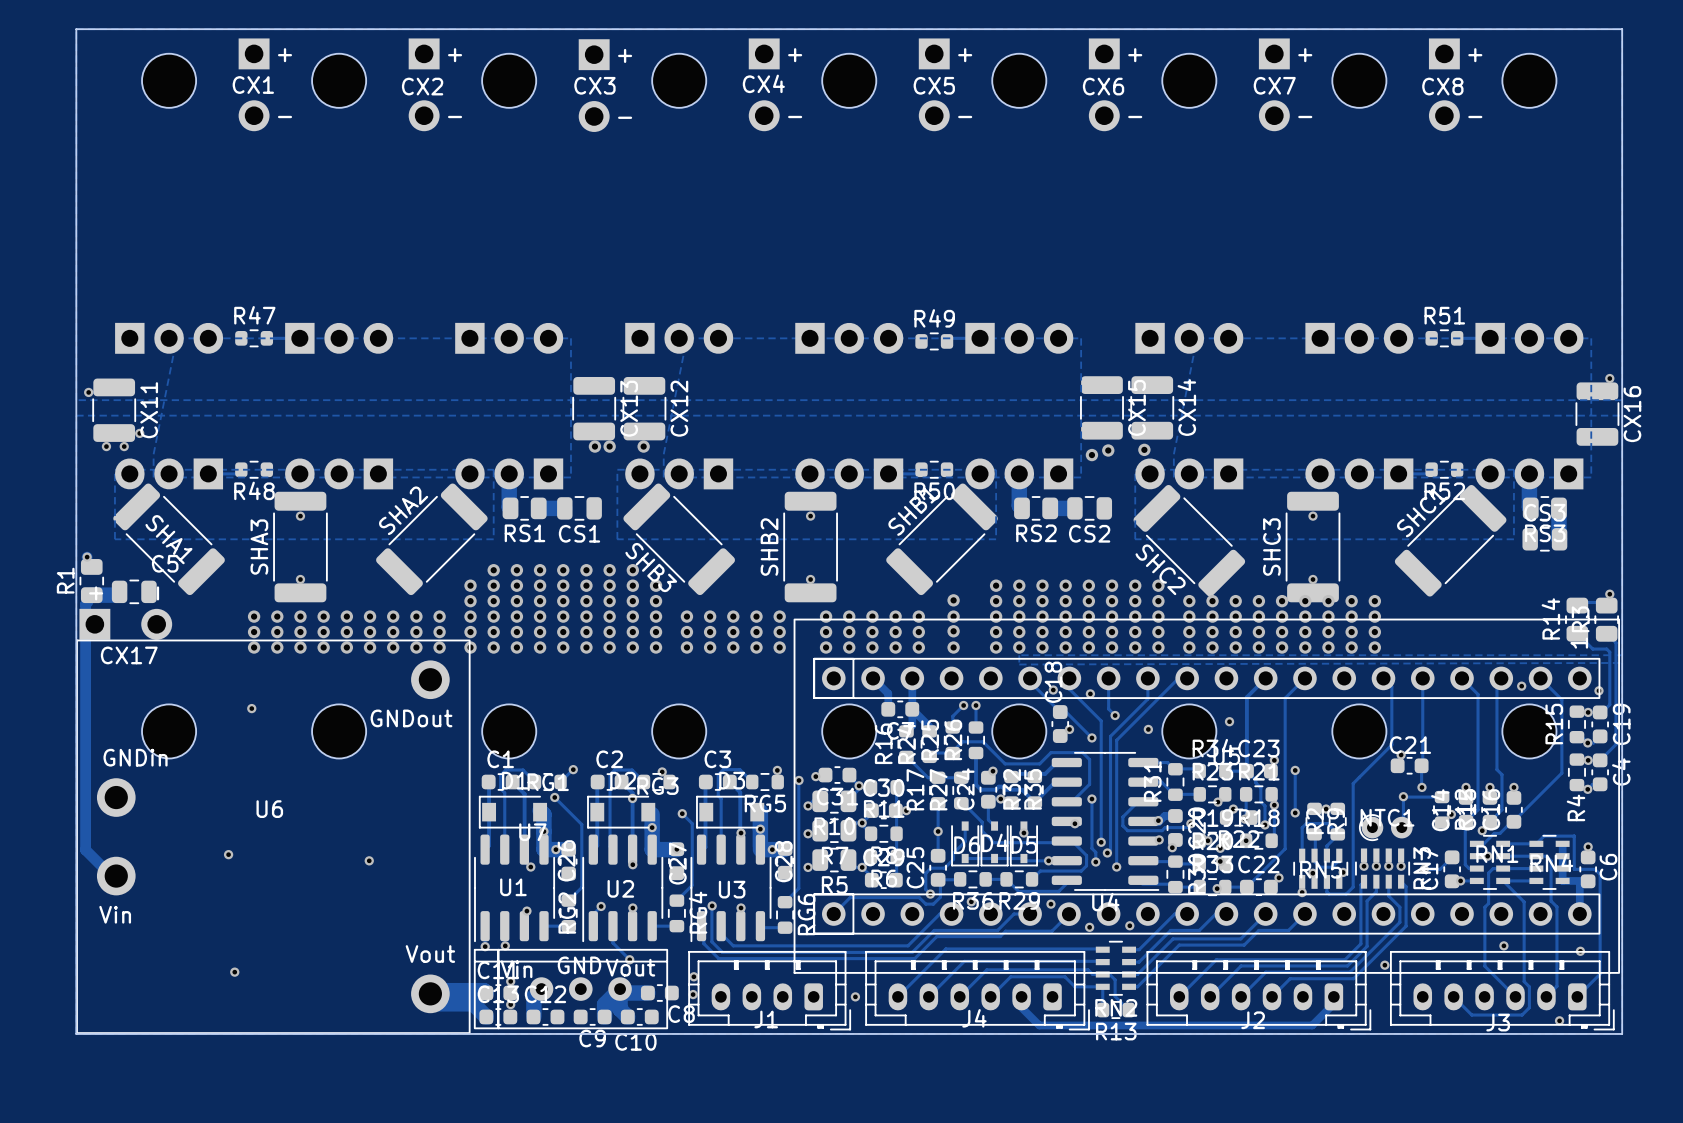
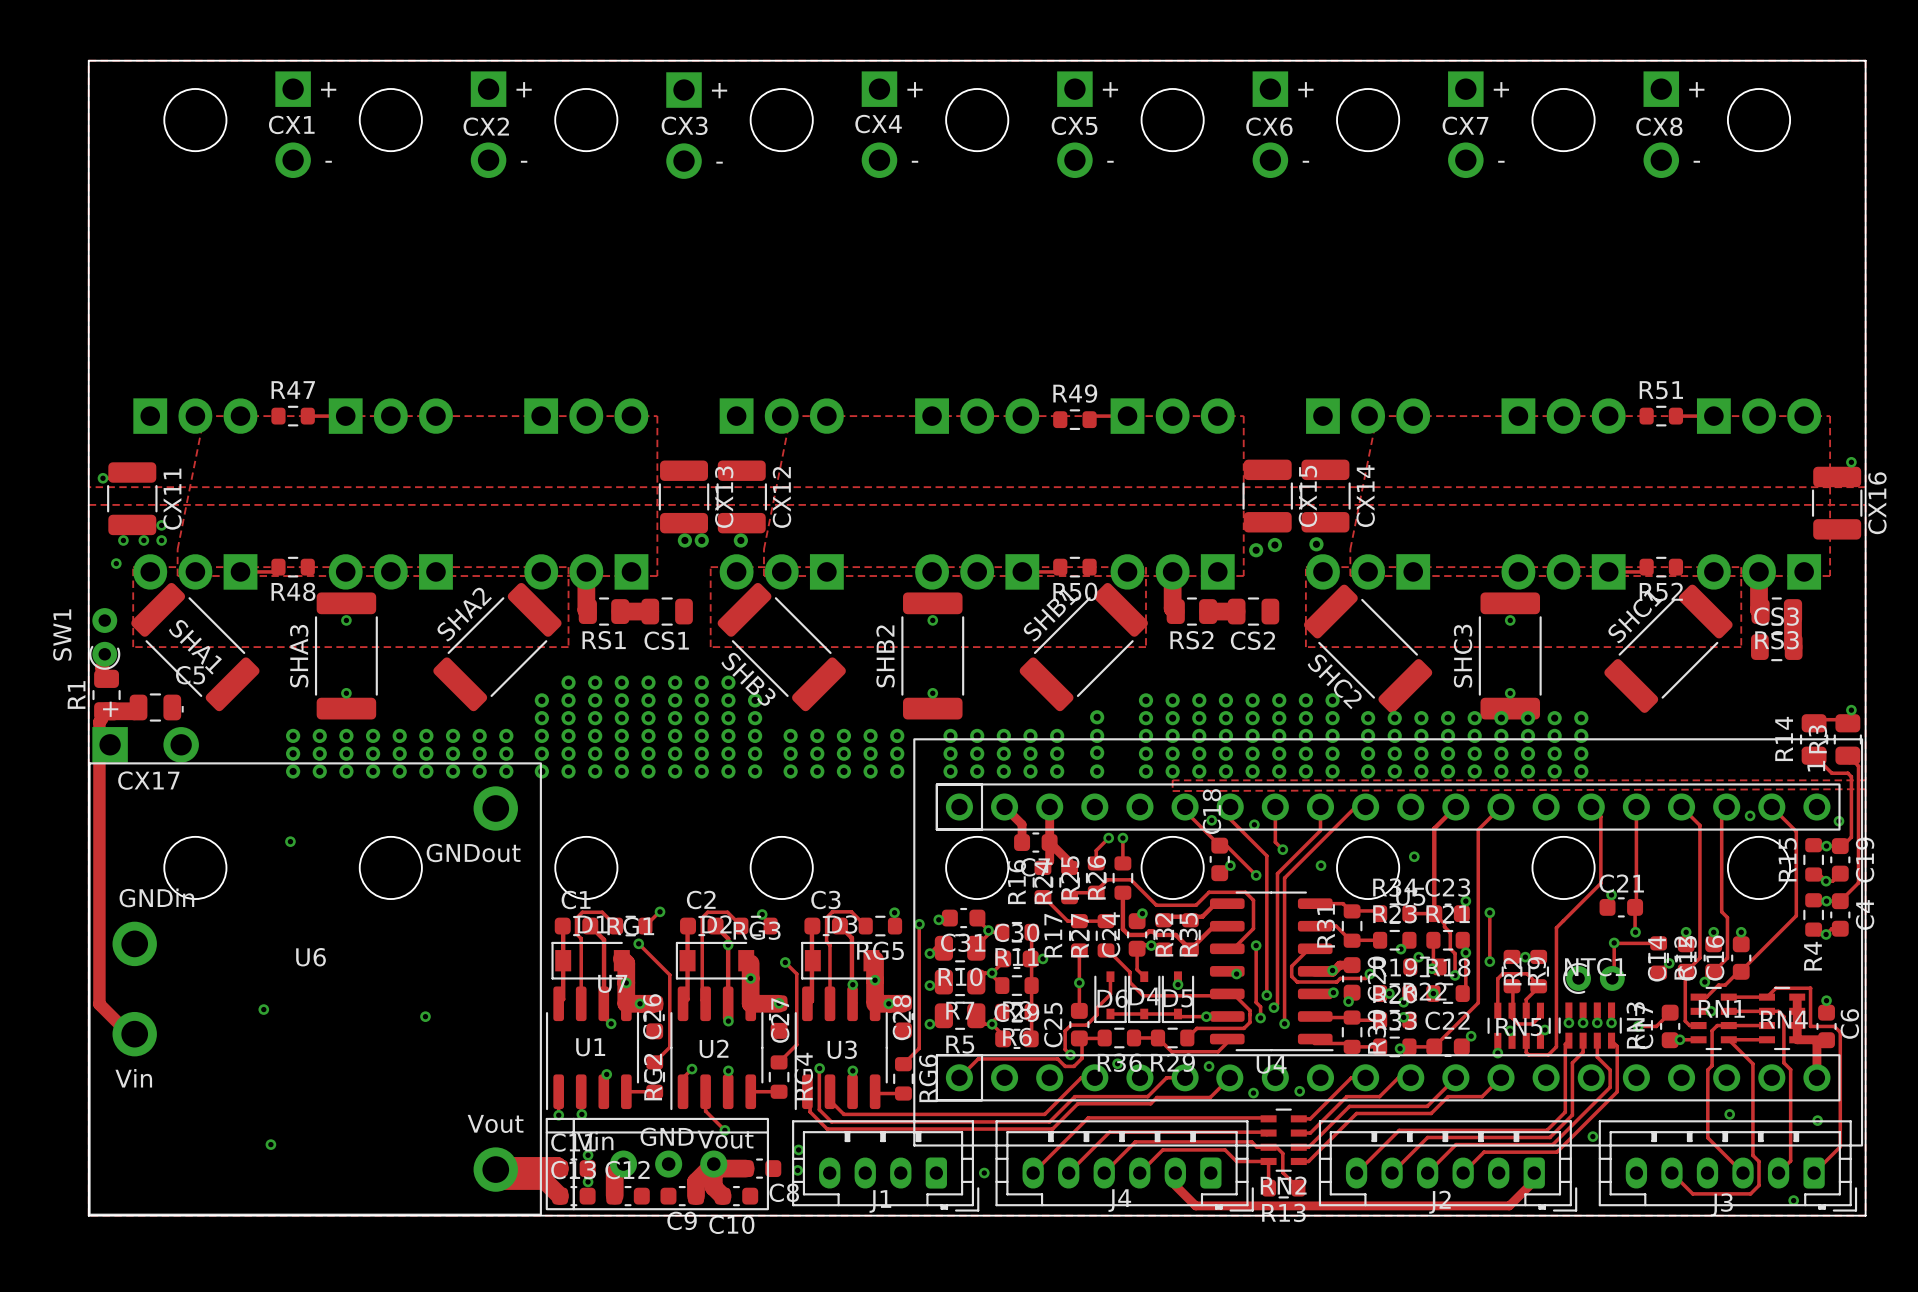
via: none -> (161, 540)
via: none -> (116, 563)
SW1: none -> (104, 638)
via: (87, 557) -> none

